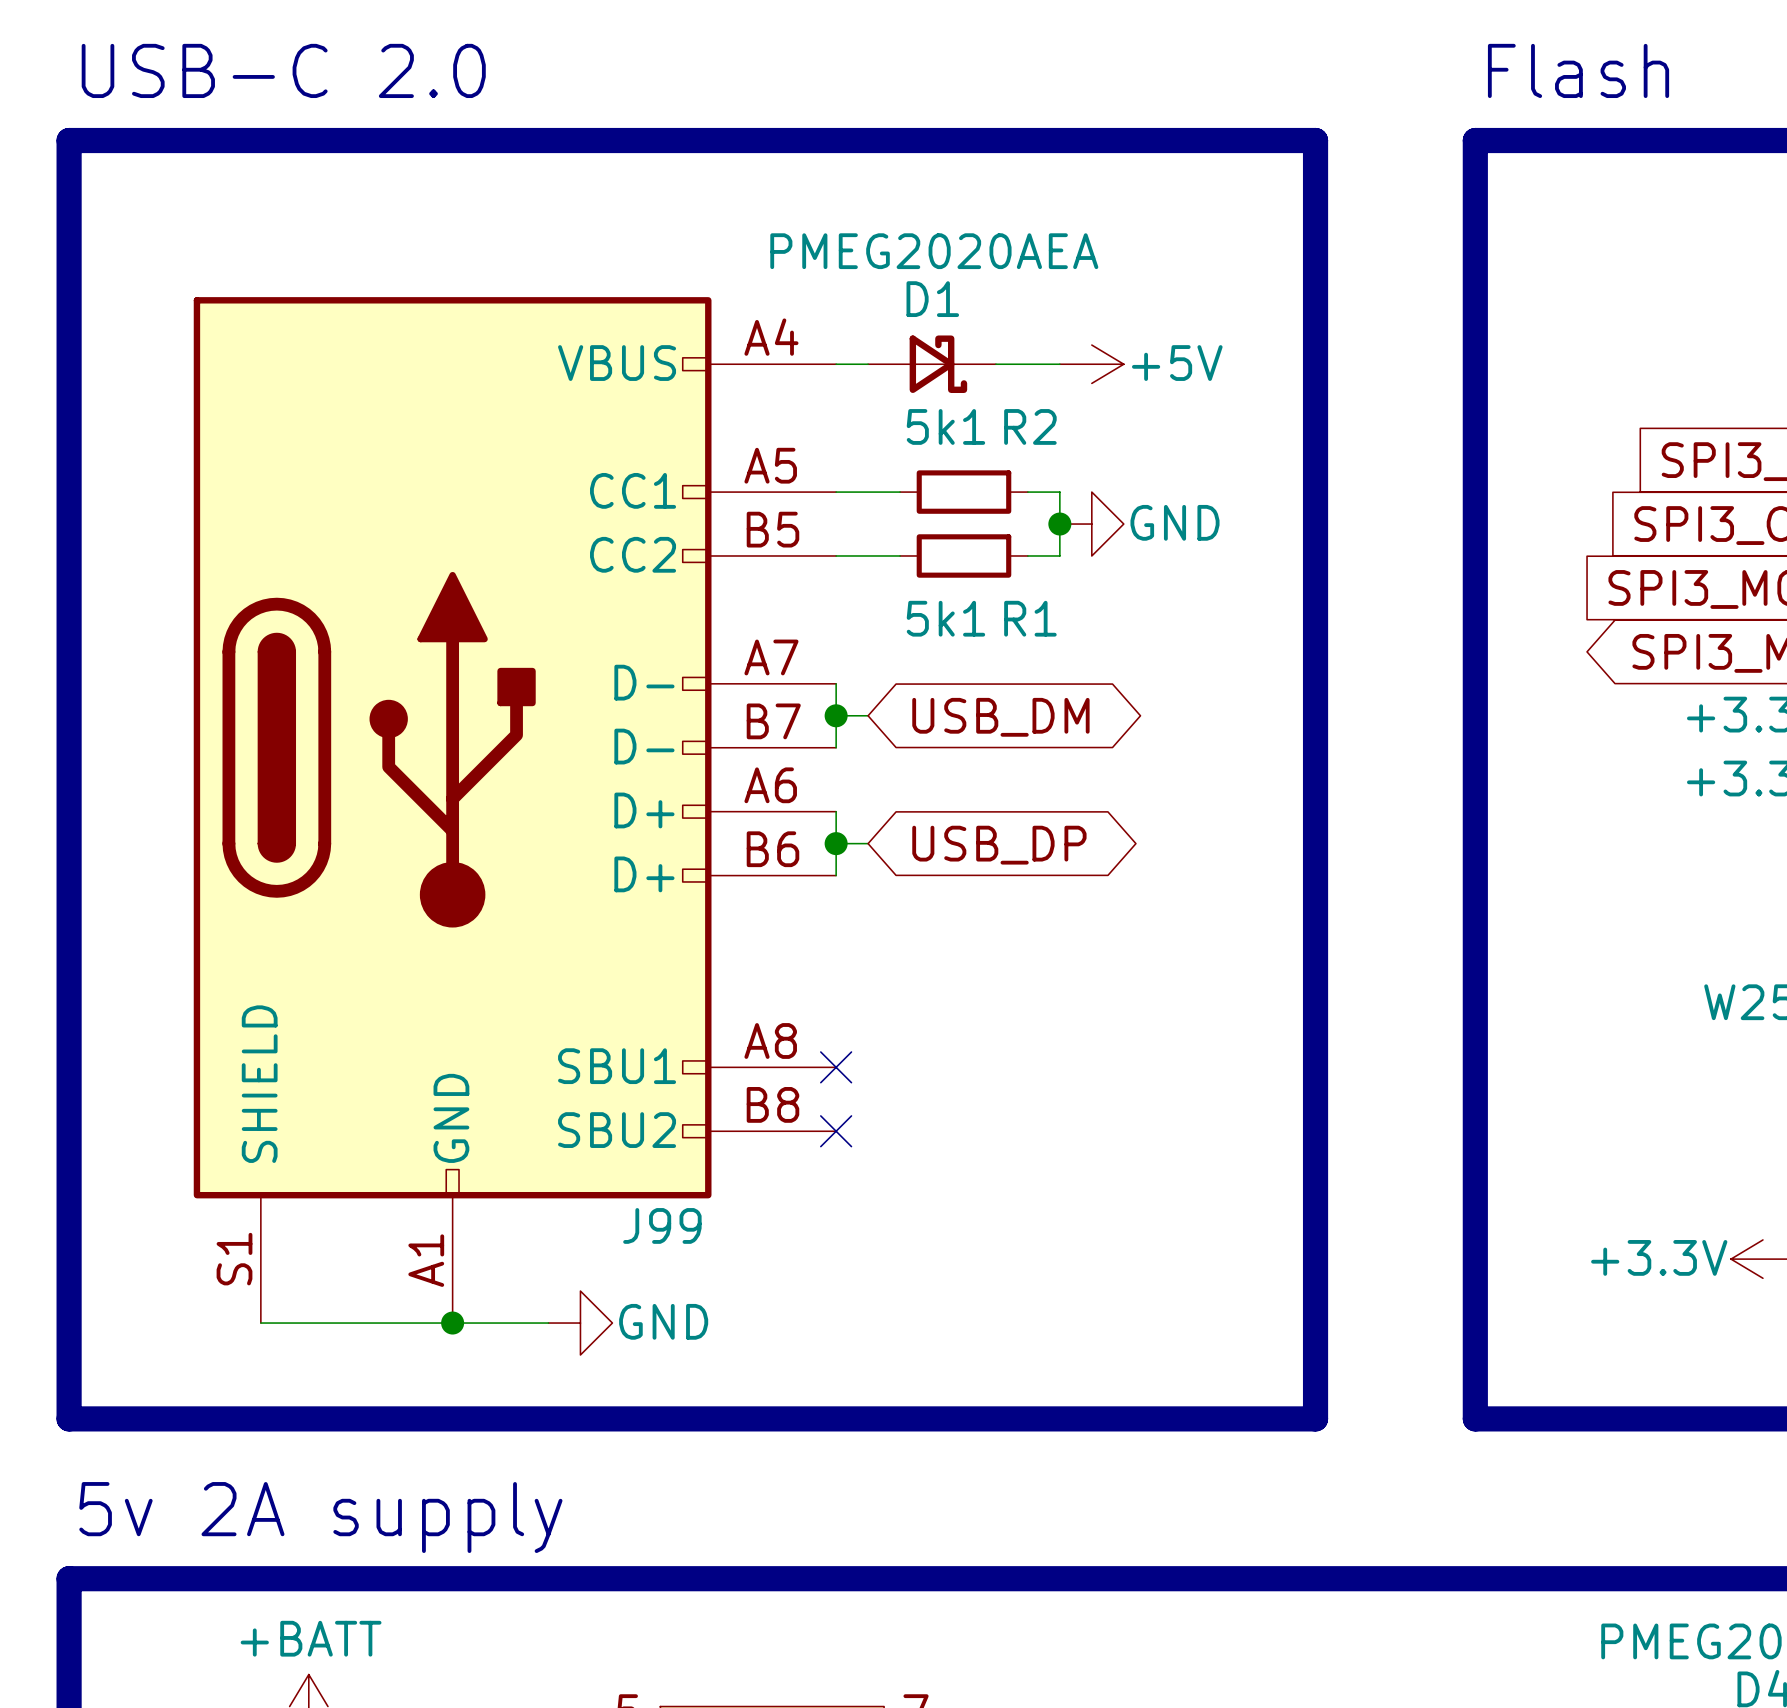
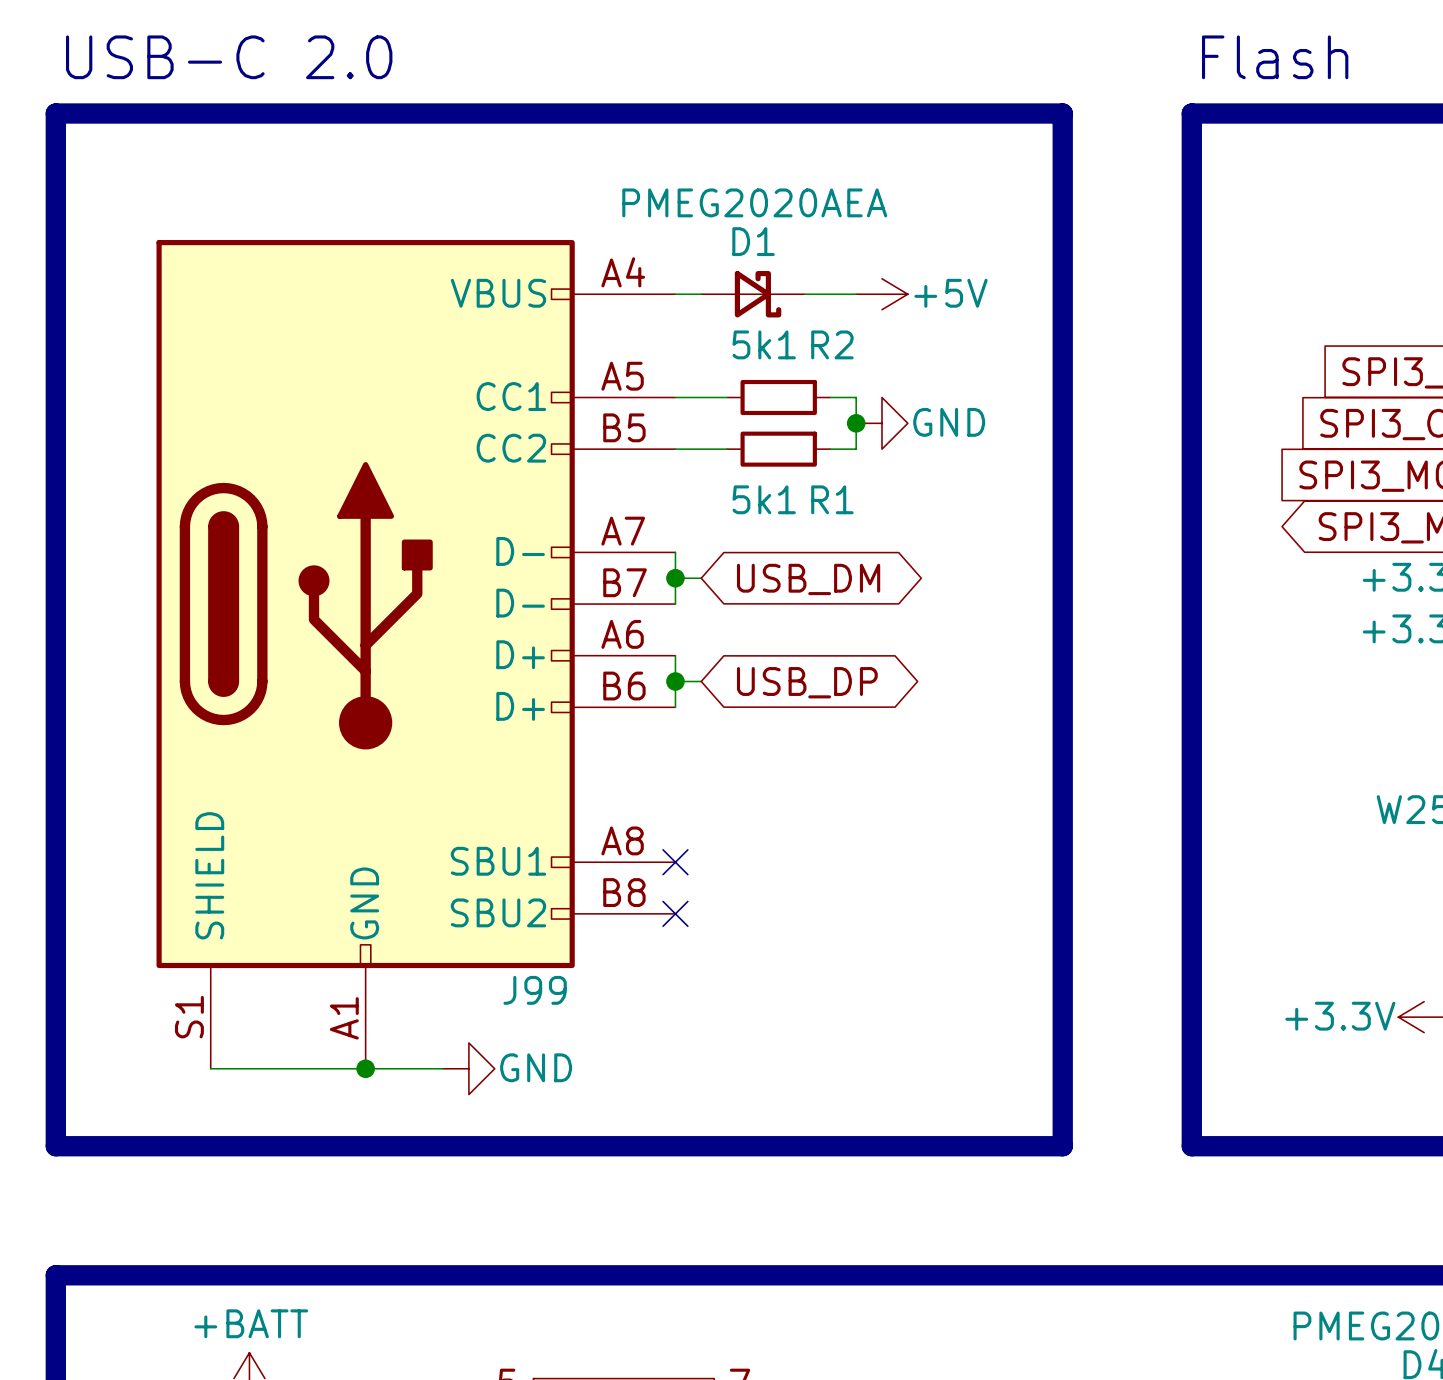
text: 5v 2A supply (320, 1517) -> none

